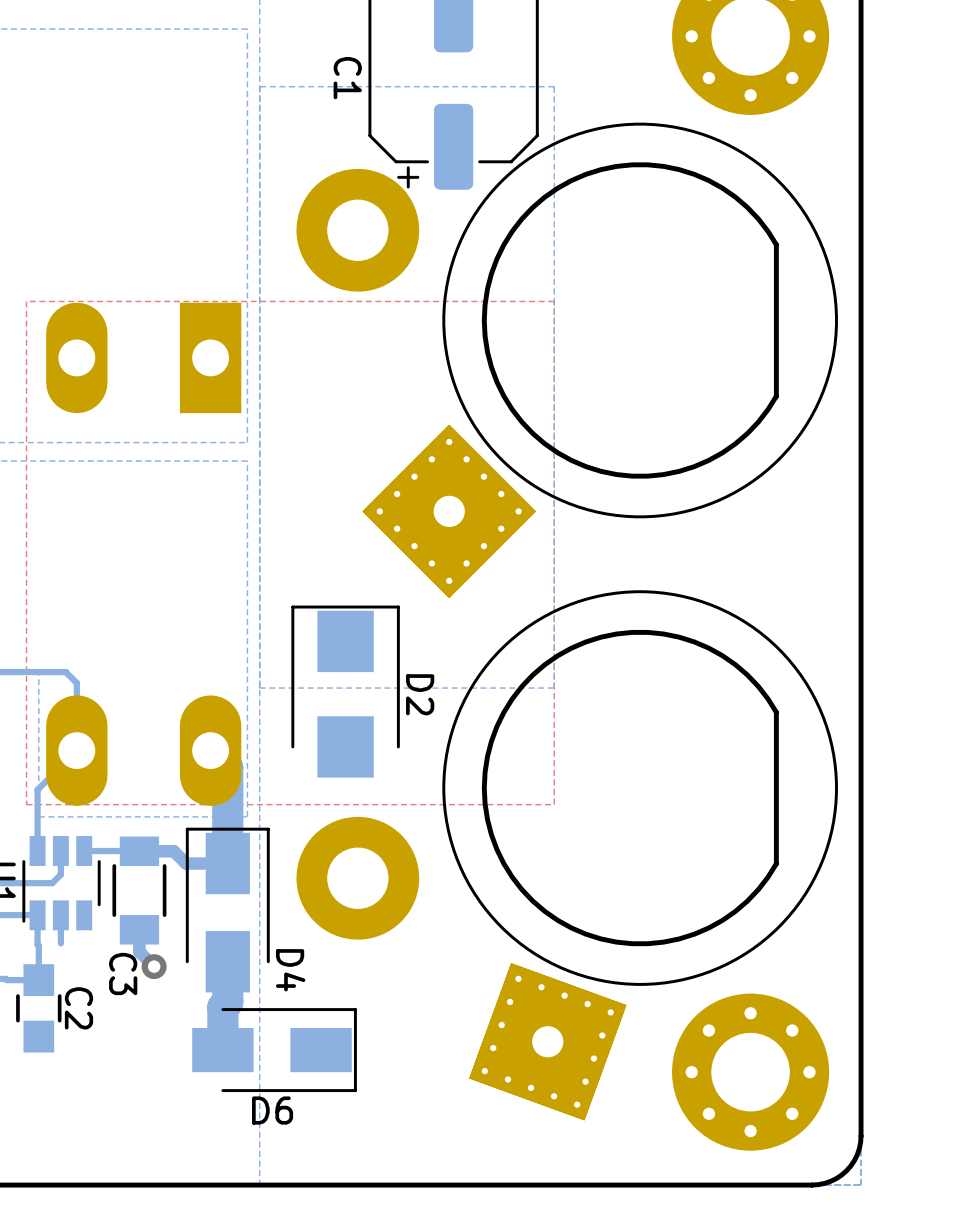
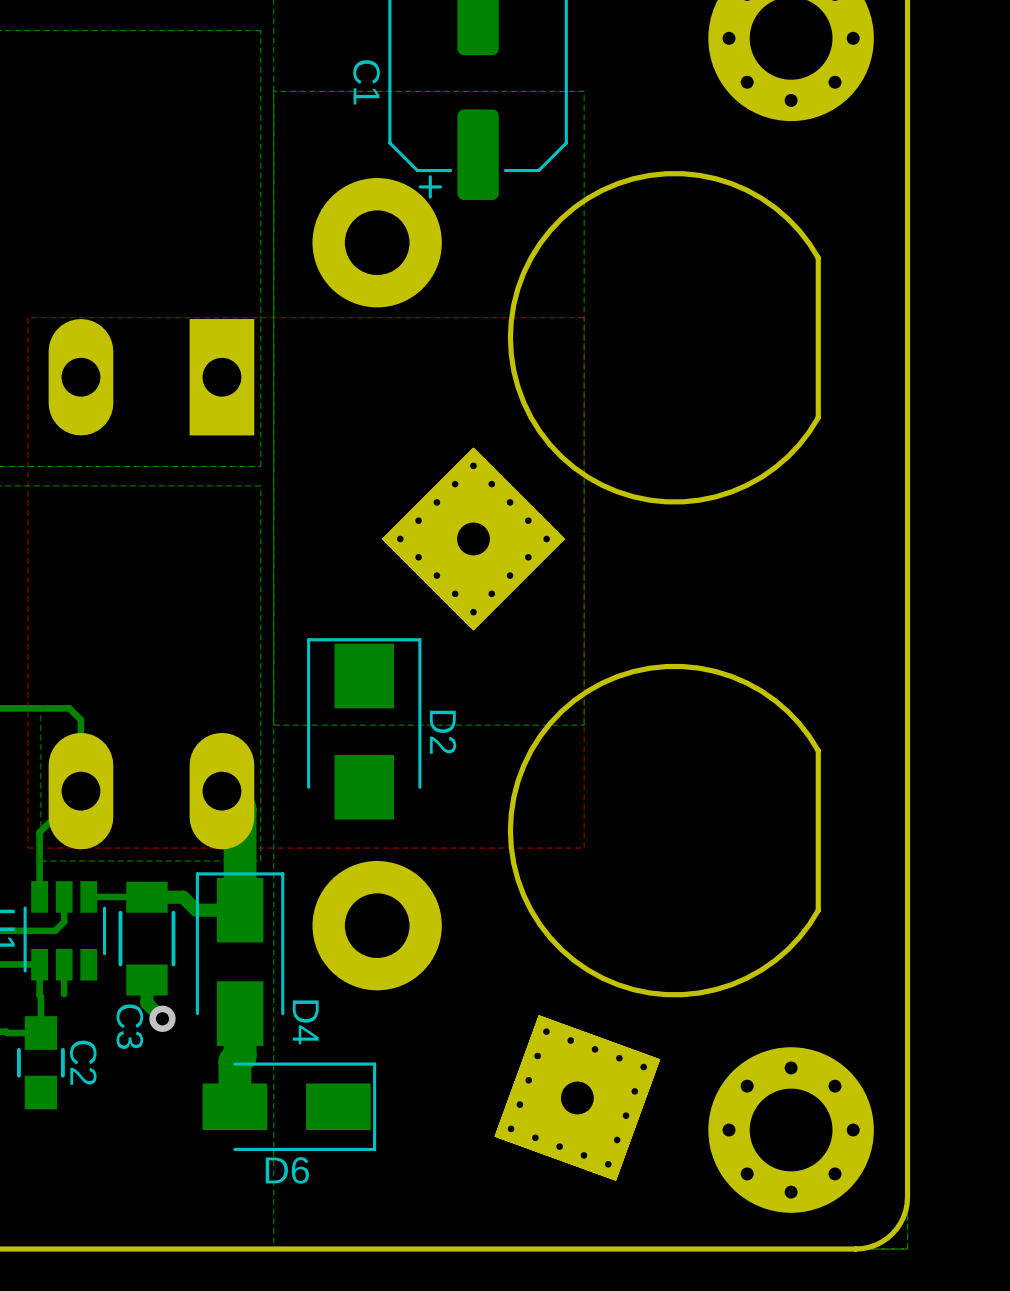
part: (600, 360) -> none
part: (640, 855) -> none

